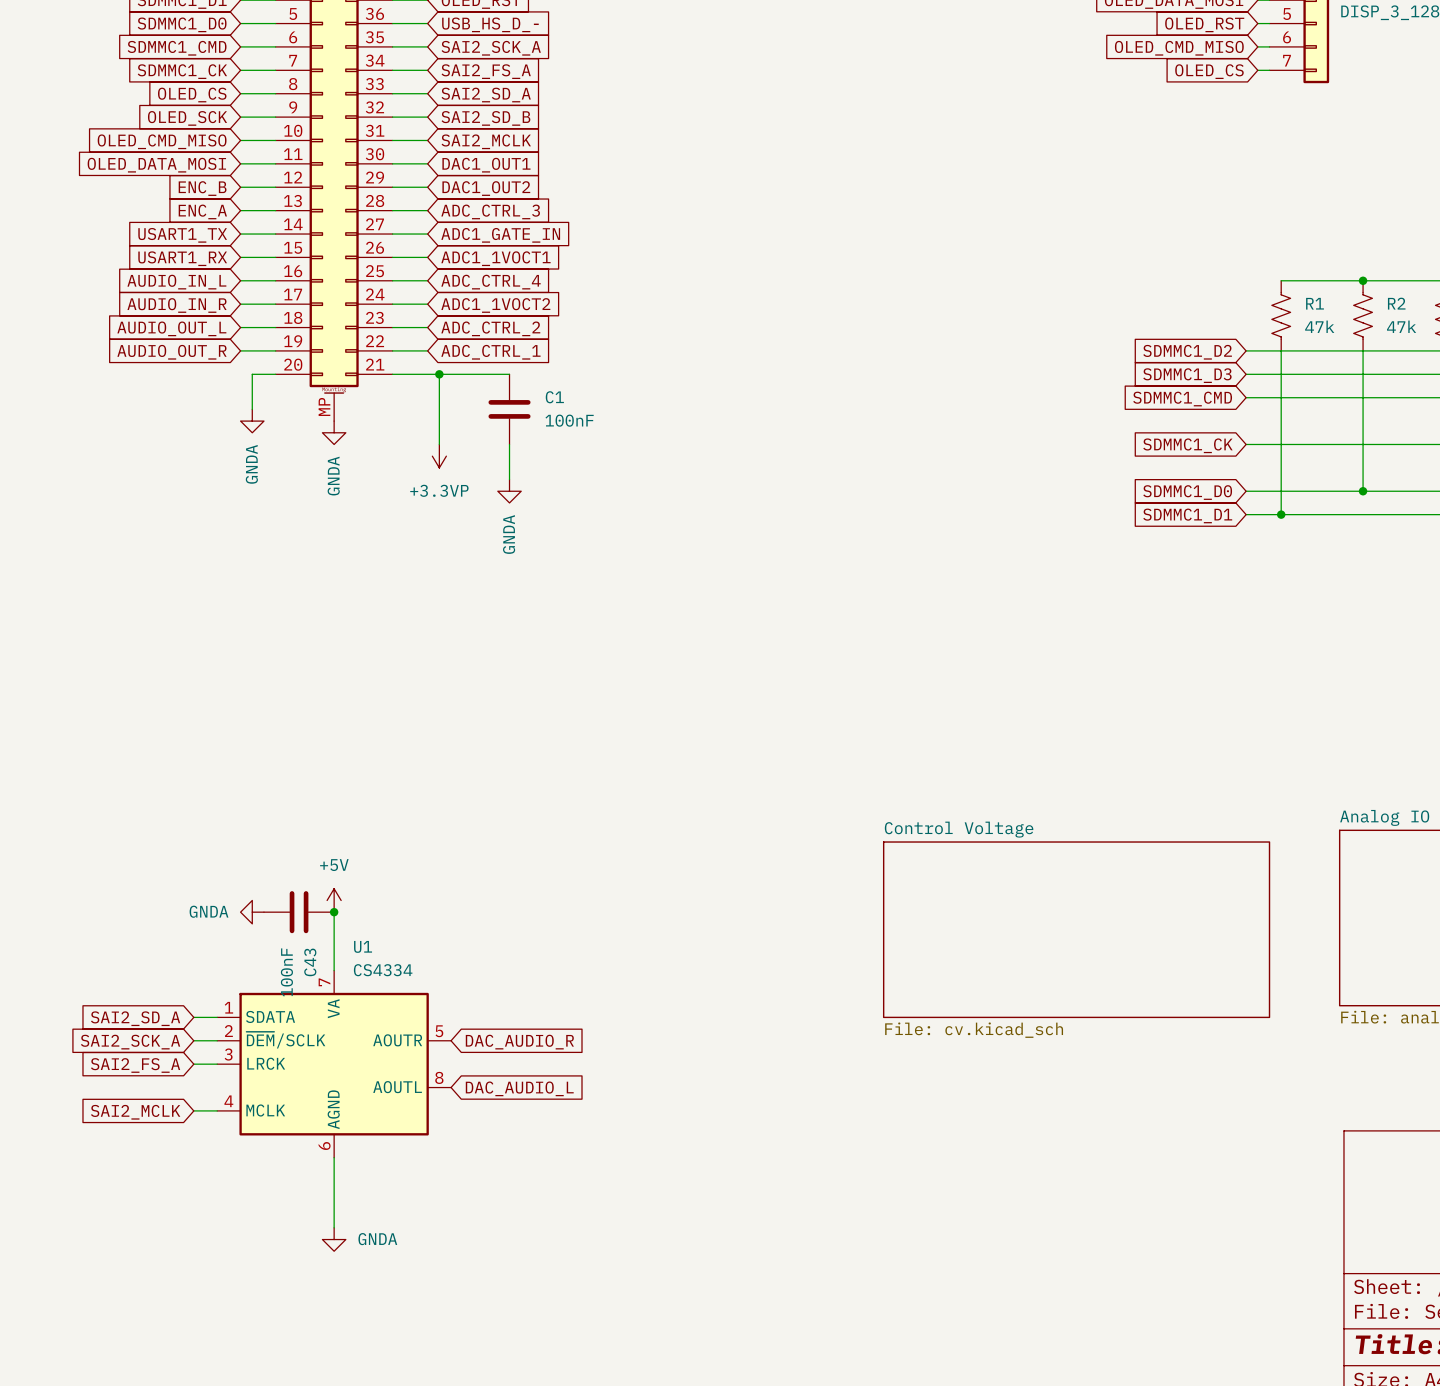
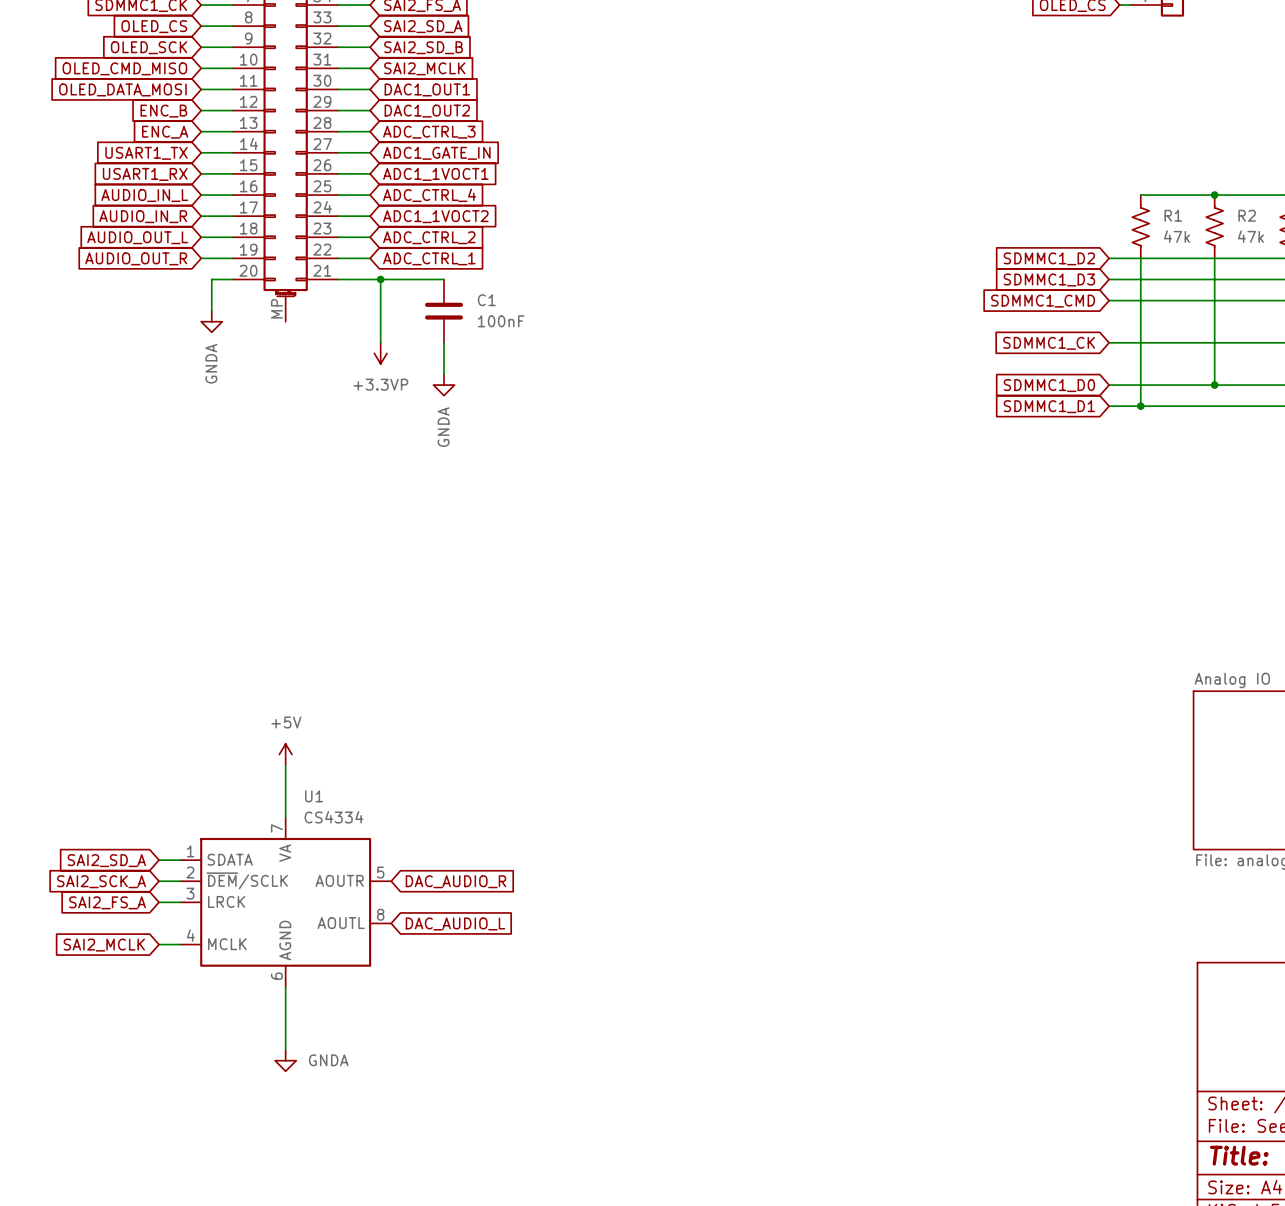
power symbol: GNDA (334, 432) -> none
power symbol: GNDA (252, 912) -> none
C43: 100nF (299, 912) -> none
junction: (334, 912) -> none
sheet Control Voltage: File: cv.kicad_sch (1076, 929) -> none

